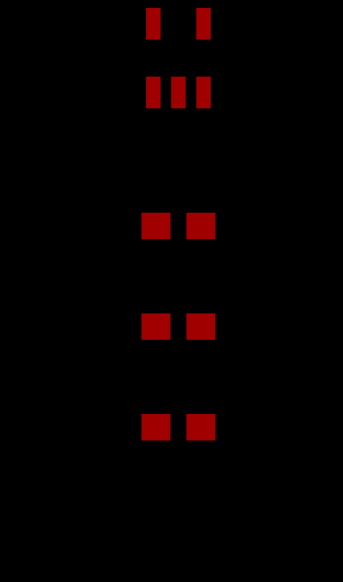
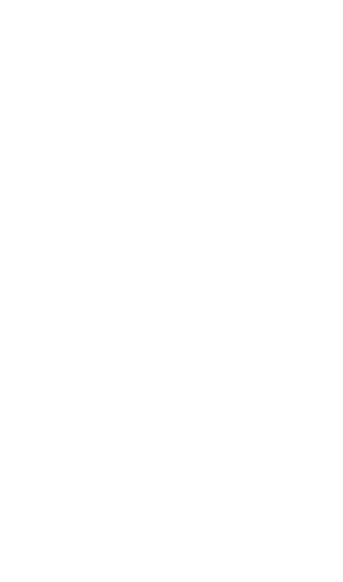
part: (178, 58) -> none
part: (178, 225) -> none
part: (178, 326) -> none
part: (178, 427) -> none

